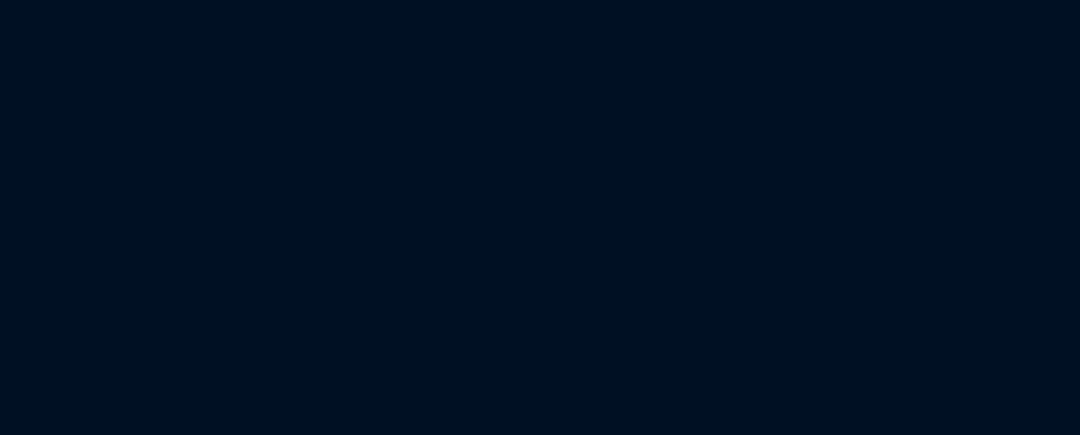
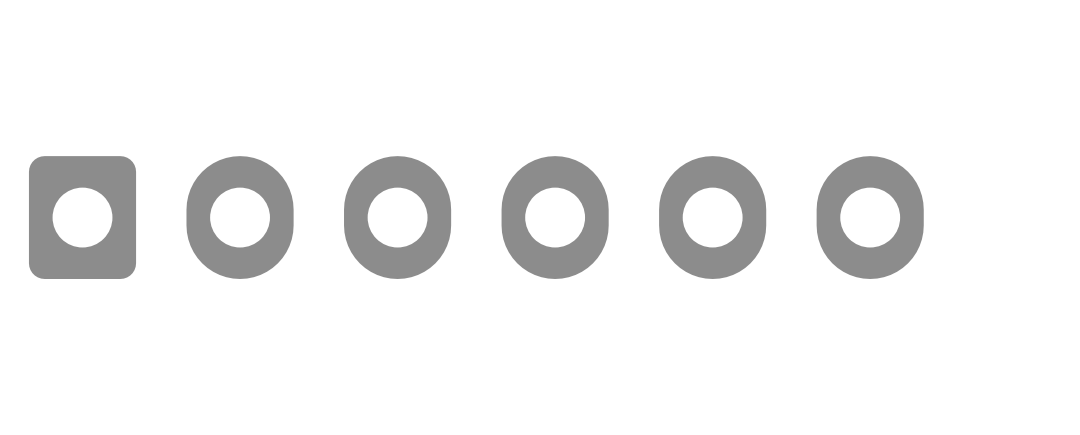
part: none -> (476, 217)

